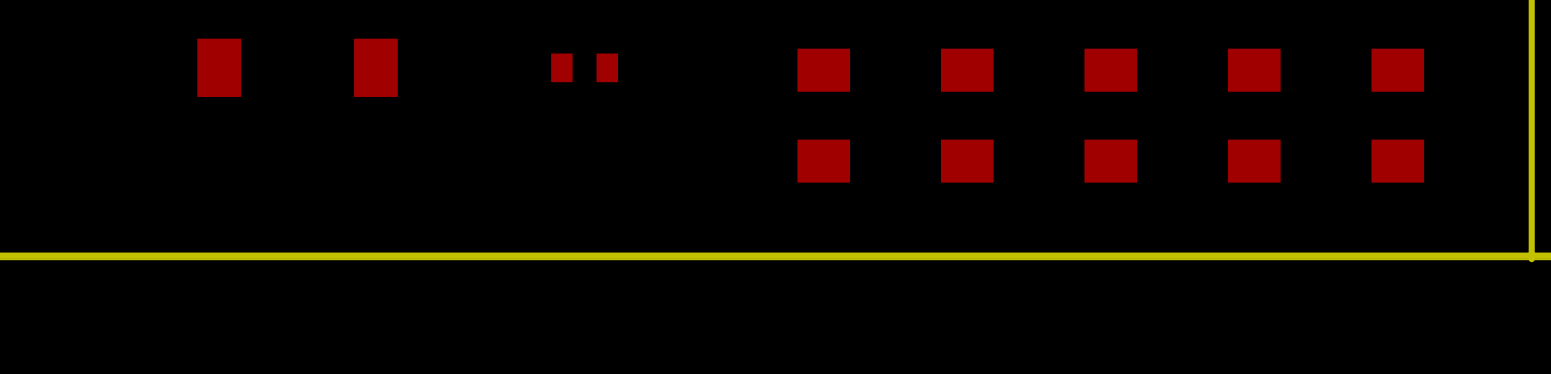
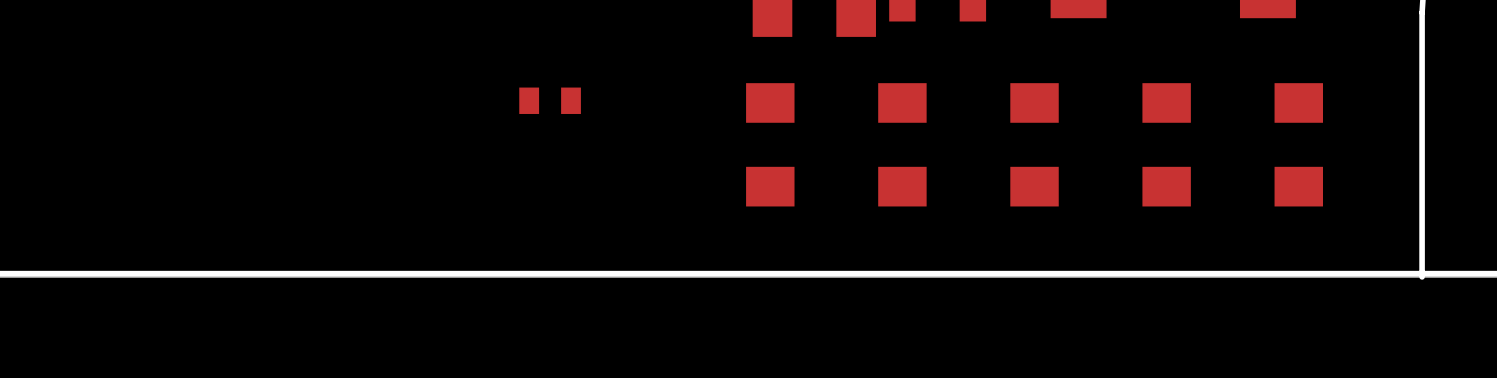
part: (297, 67) -> none

